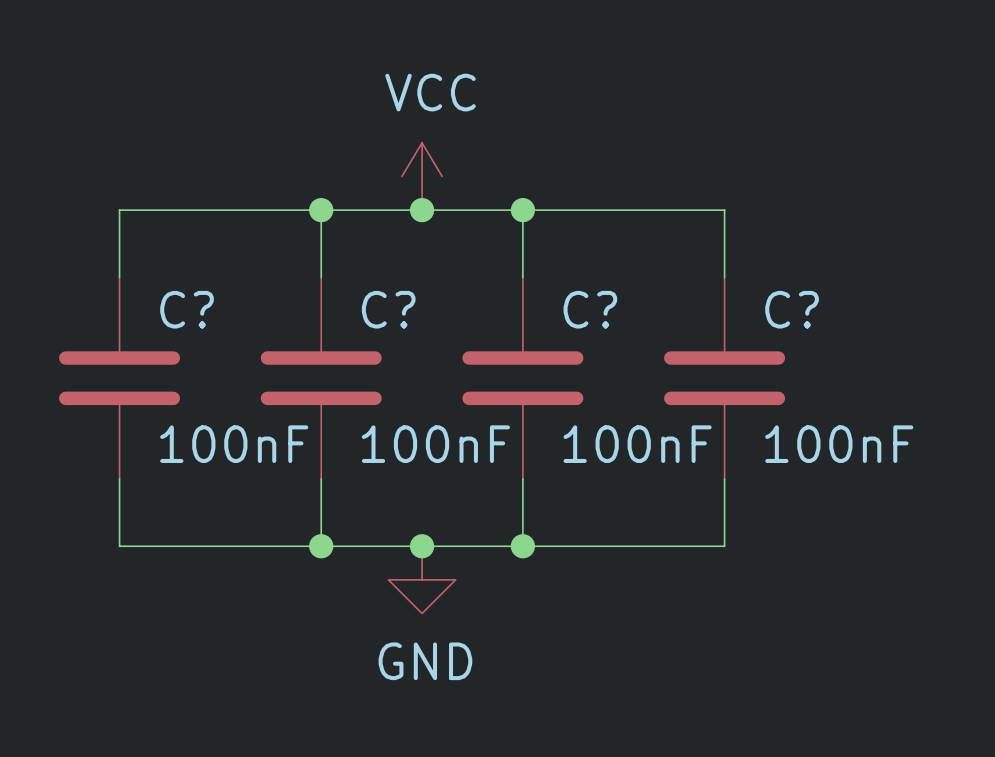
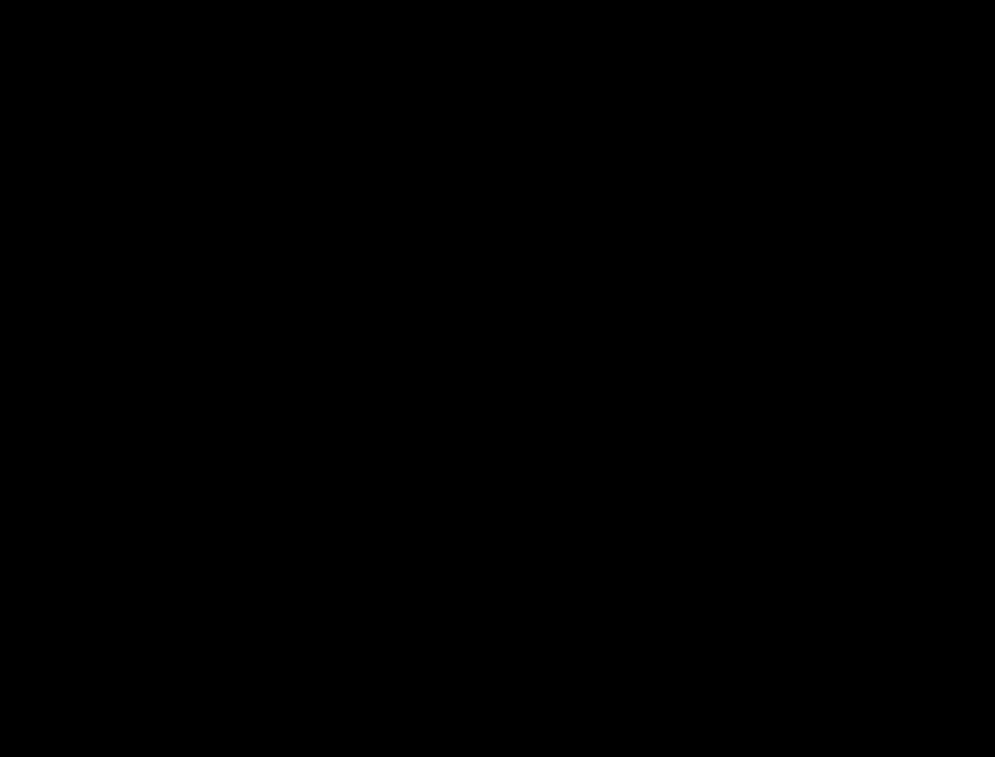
power symbol: VCC (422, 176) -> none
wire: (321, 210) (321, 277) -> none
junction: (321, 210) -> none
junction: (422, 210) -> none
wire: (522, 210) (522, 277) -> none
junction: (522, 210) -> none
wire: (119, 277) (119, 210) (724, 210) (724, 277) -> none
C?: 100nF (119, 378) -> none
C?: 100nF (321, 378) -> none
C?: 100nF (522, 378) -> none
C?: 100nF (724, 378) -> none
wire: (119, 479) (119, 546) (724, 546) (724, 479) -> none
wire: (321, 479) (321, 546) -> none
wire: (522, 479) (522, 546) -> none
junction: (321, 546) -> none
junction: (422, 546) -> none
junction: (522, 546) -> none
power symbol: GND (422, 579) -> none

